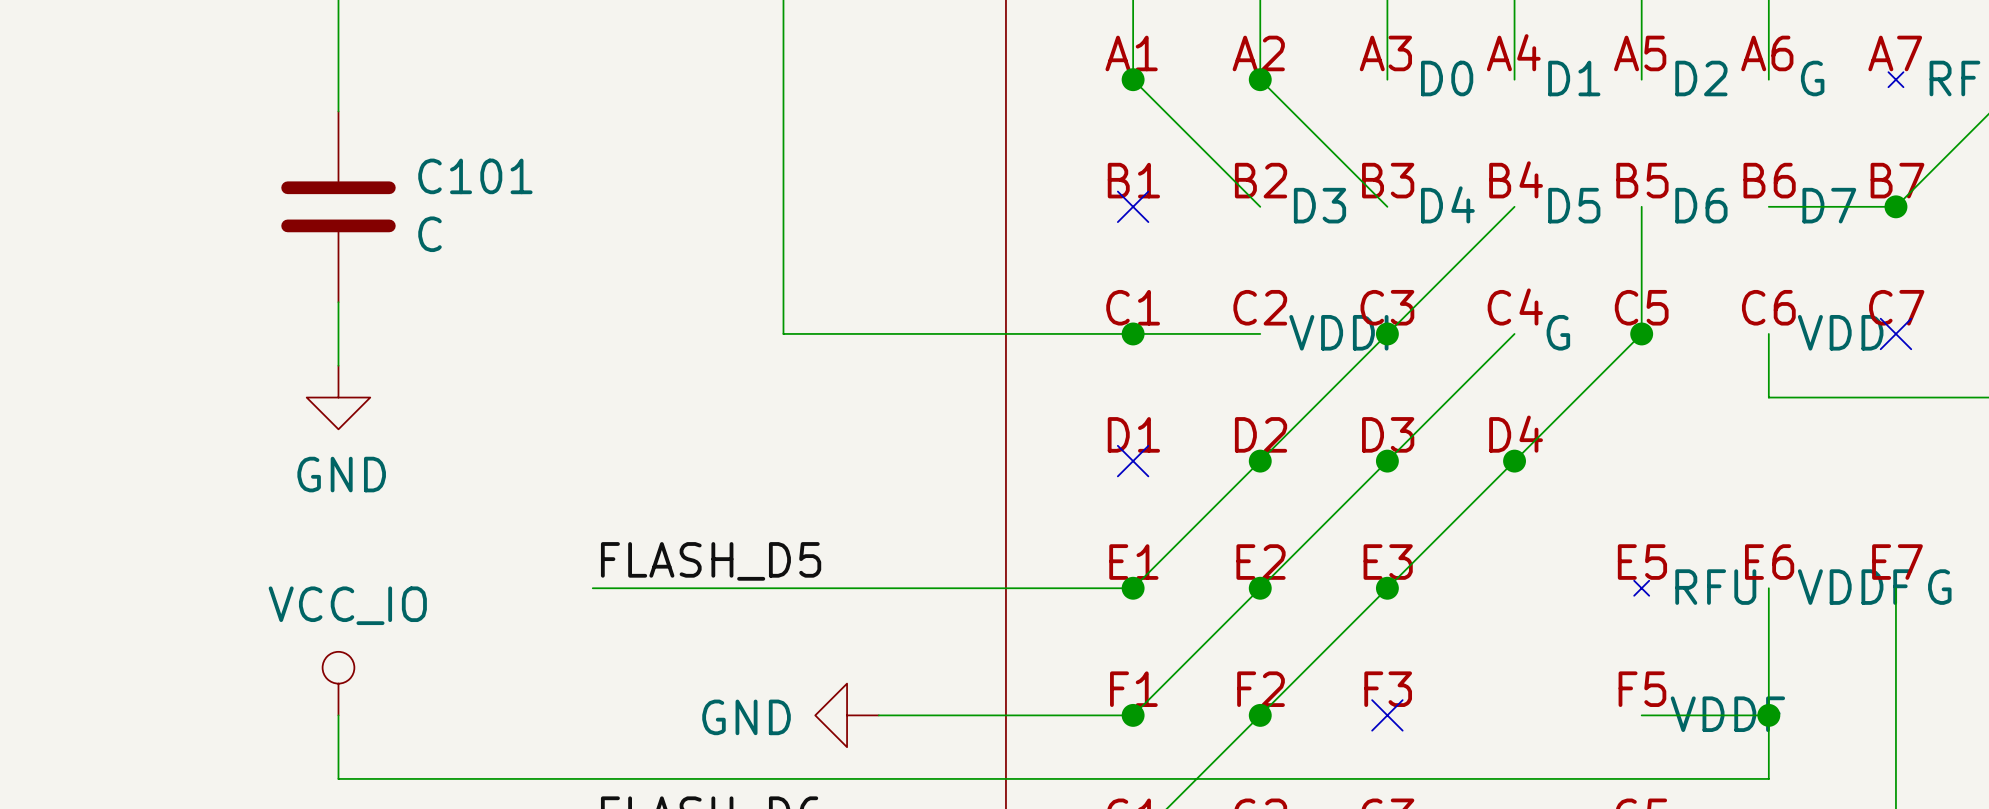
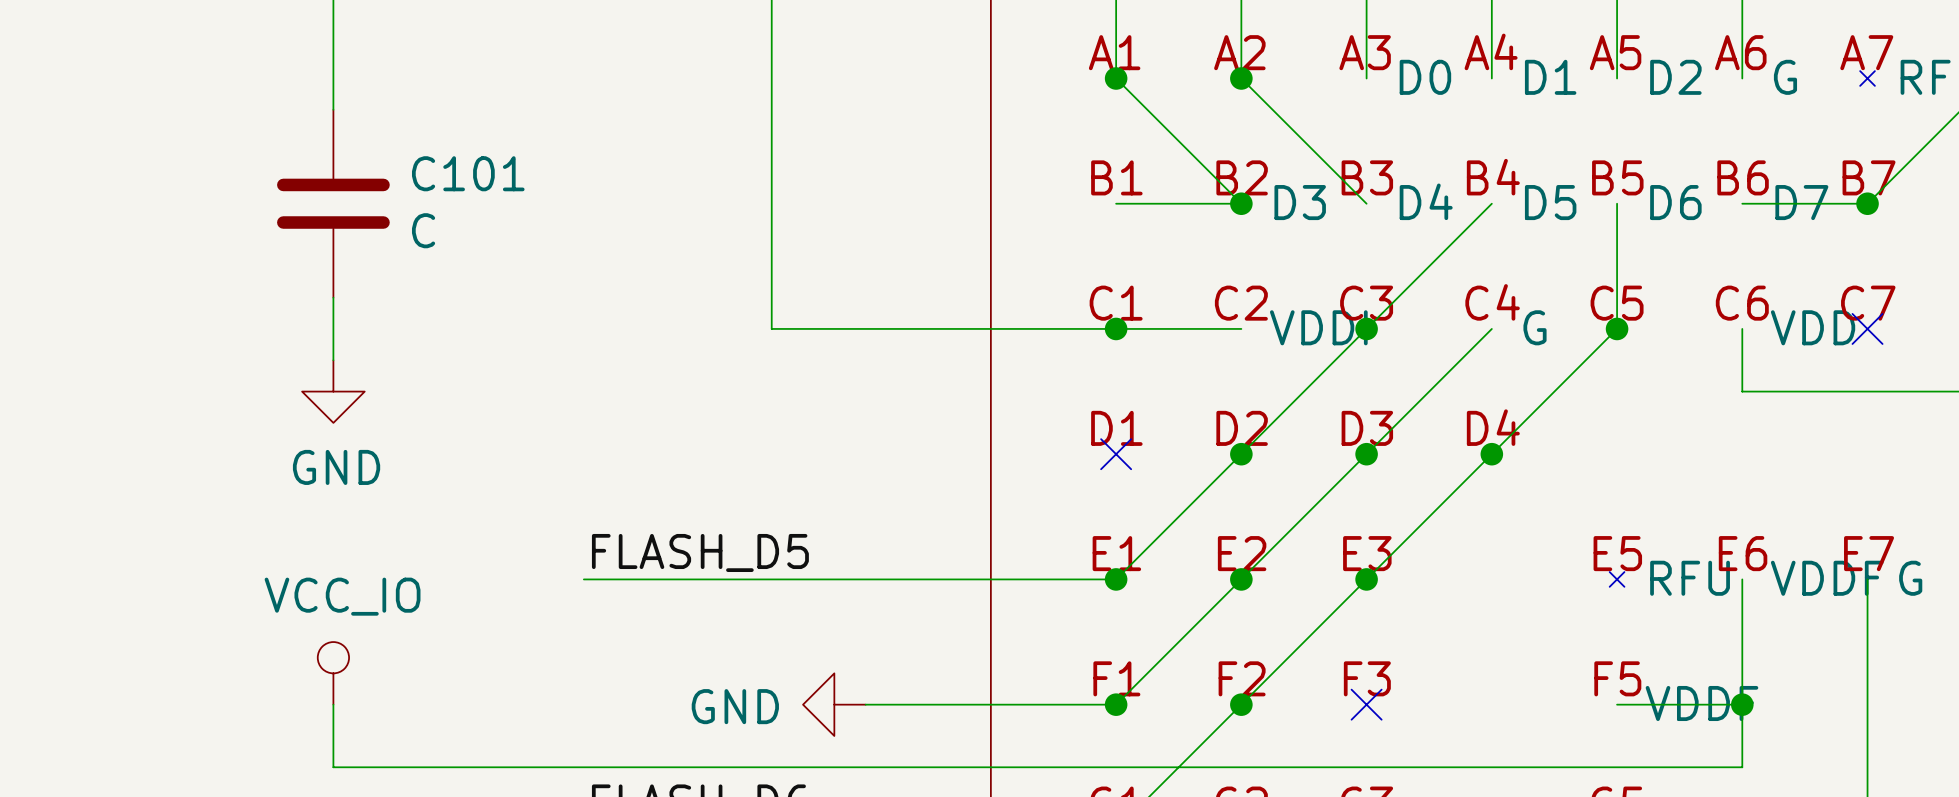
wire: none -> (1116, 203) (1241, 203)
no-connect mark: (1133, 206) -> none
junction: none -> (1241, 203)

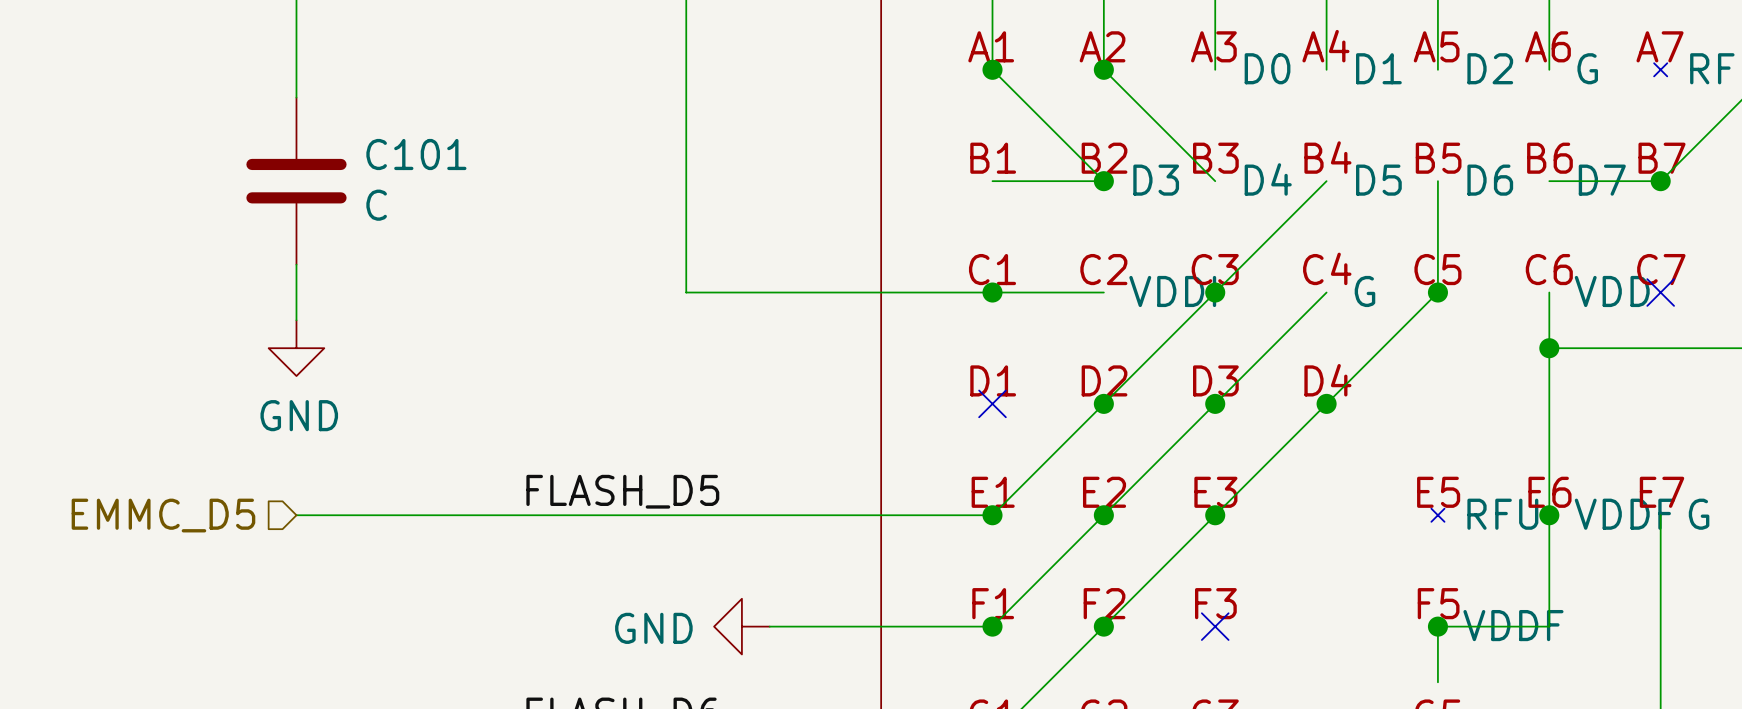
wire: none -> (1549, 348) (1549, 515)
junction: none -> (1549, 348)
hierarchical label: none -> EMMC_D5 (163, 515)
wire: none -> (296, 515) (519, 515)
junction: none -> (1549, 515)
power symbol: VCC_IO (333, 673) -> none
wire: (333, 704) (333, 767) (1742, 767) (1742, 704) -> none
wire: none -> (1437, 626) (1437, 682)
junction: none -> (1437, 626)
junction: (1742, 704) -> none

